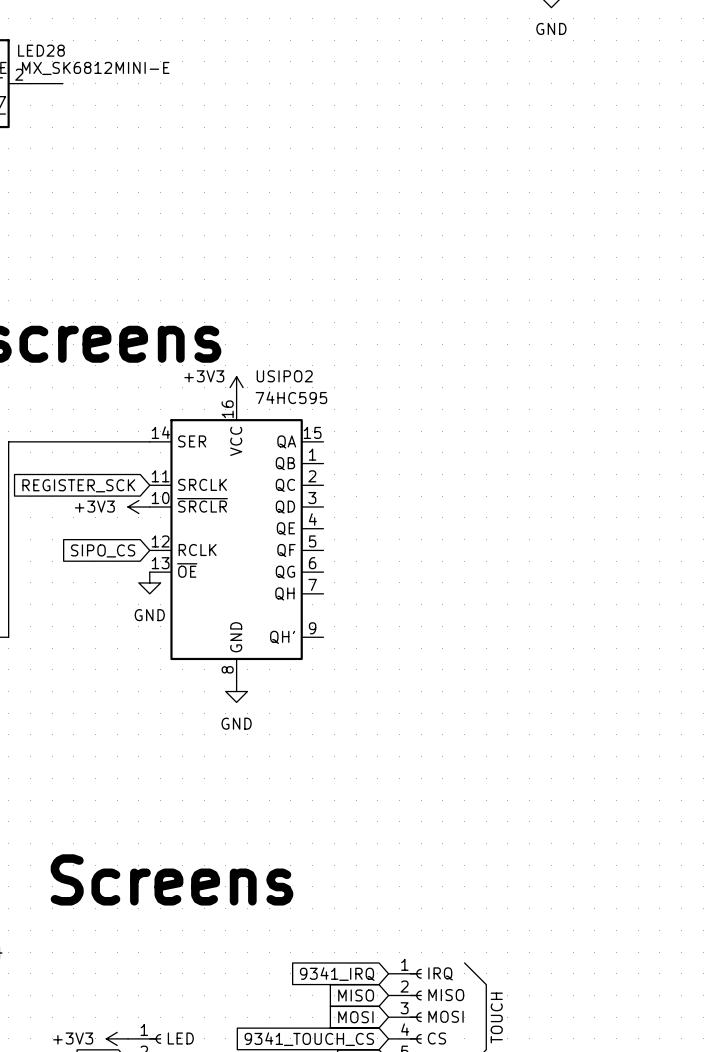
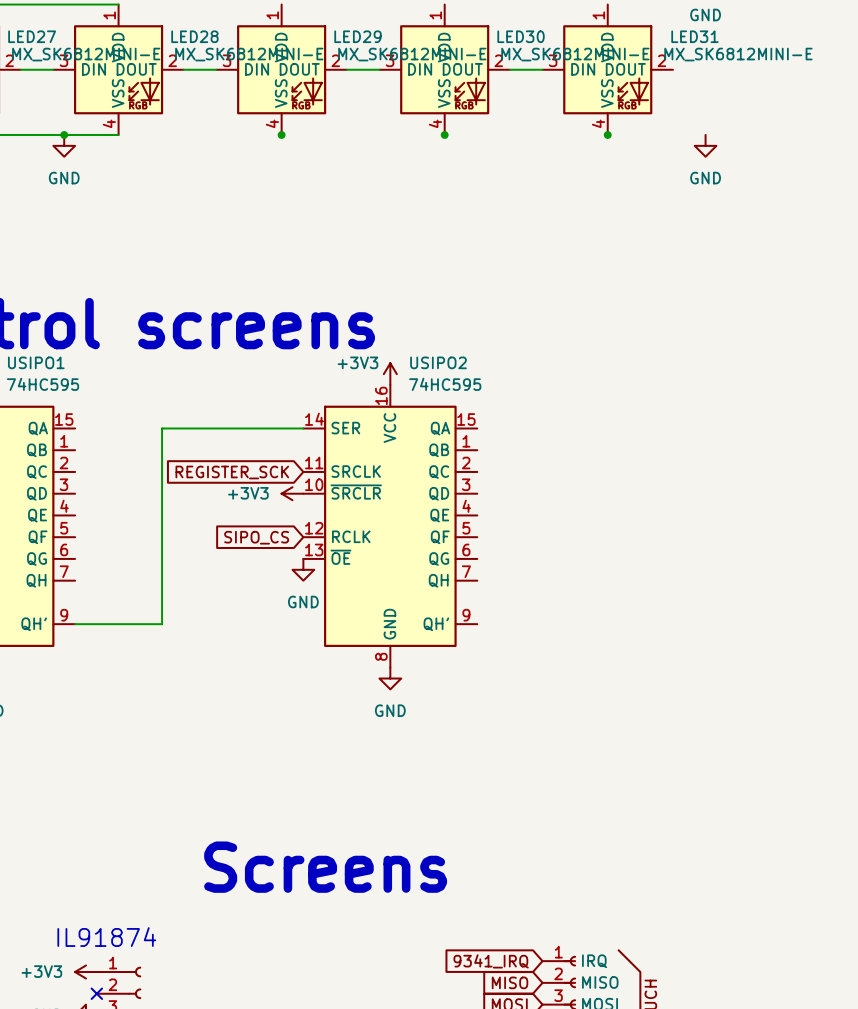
LED29: none -> MX_SK6812MINI-E (281, 69)
wire: none -> (346, 69) (379, 69)
LED30: none -> MX_SK6812MINI-E (444, 69)
wire: none -> (509, 69) (542, 69)
LED31: none -> MX_SK6812MINI-E (607, 69)
junction: none -> (281, 134)
junction: none -> (444, 134)
junction: none -> (607, 134)
power symbol: none -> GND (705, 145)

